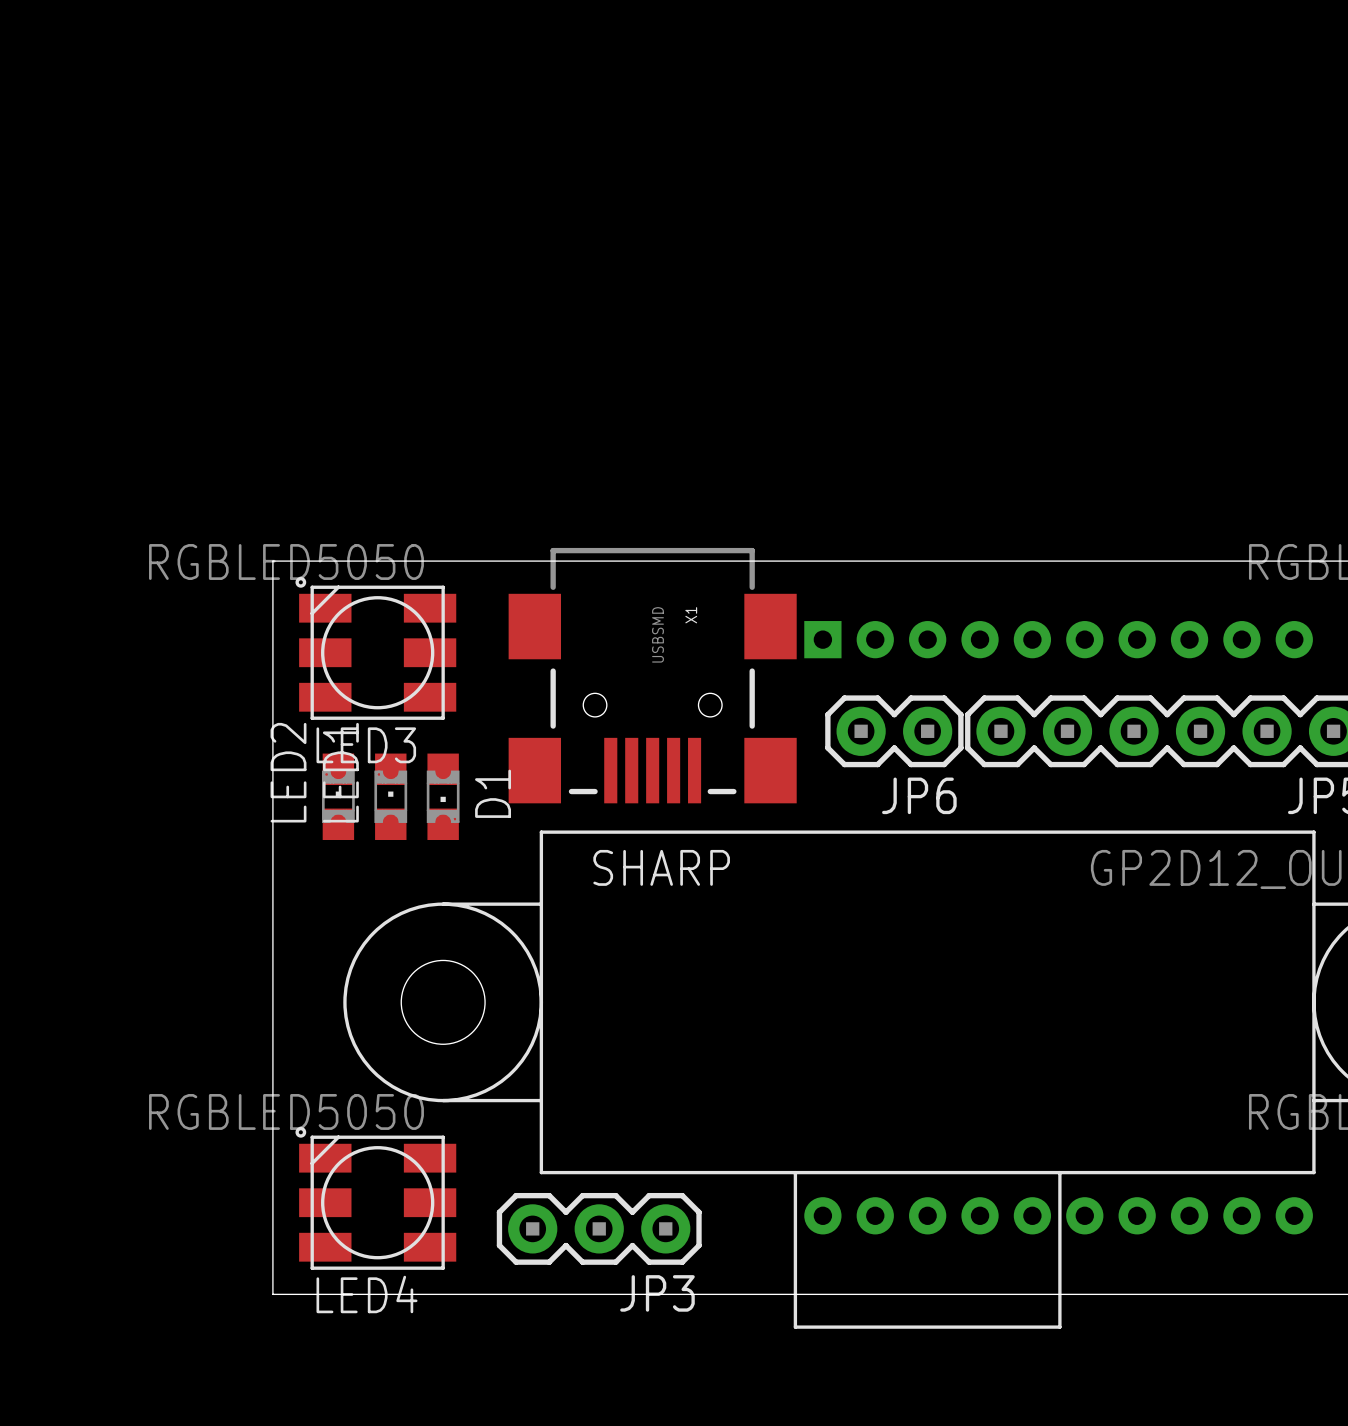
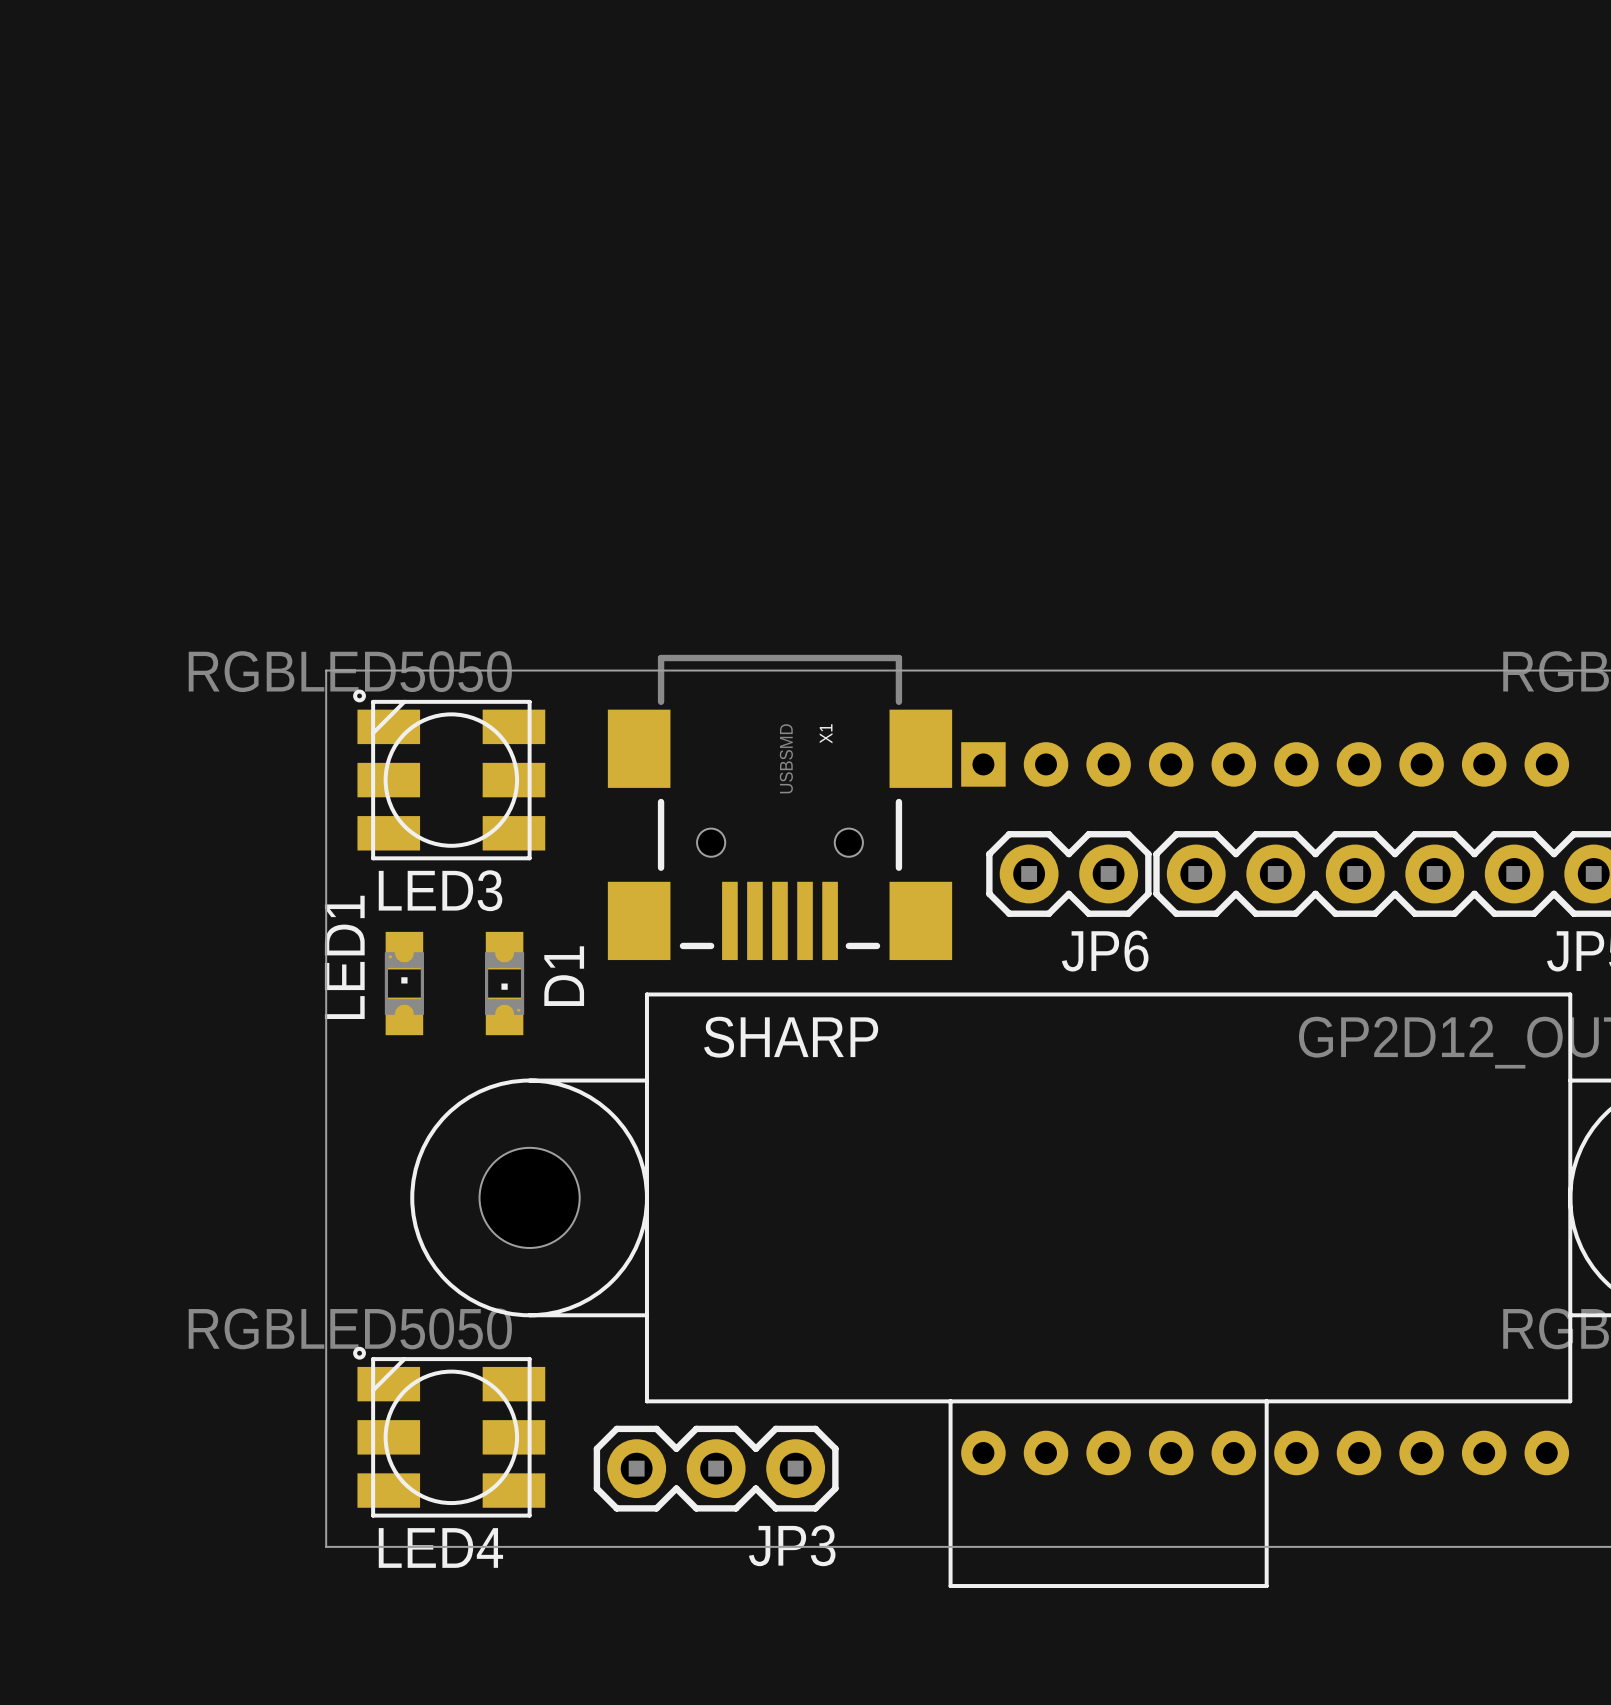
LED2: (338, 796) -> none
LED1 position: (390, 796) -> (404, 983)
D1 position: (443, 796) -> (504, 983)

